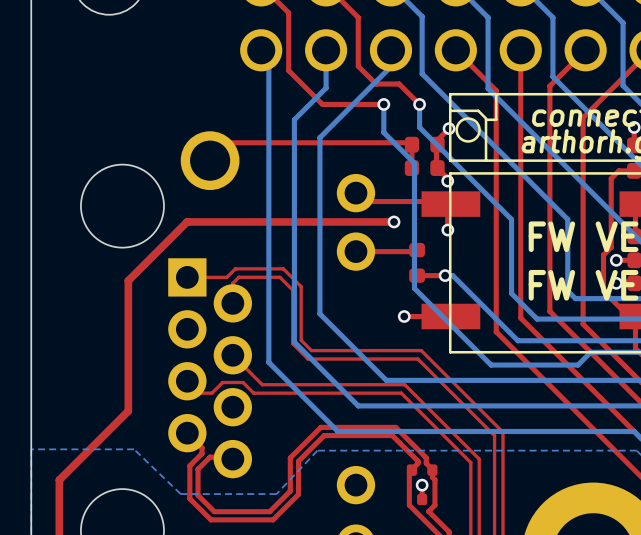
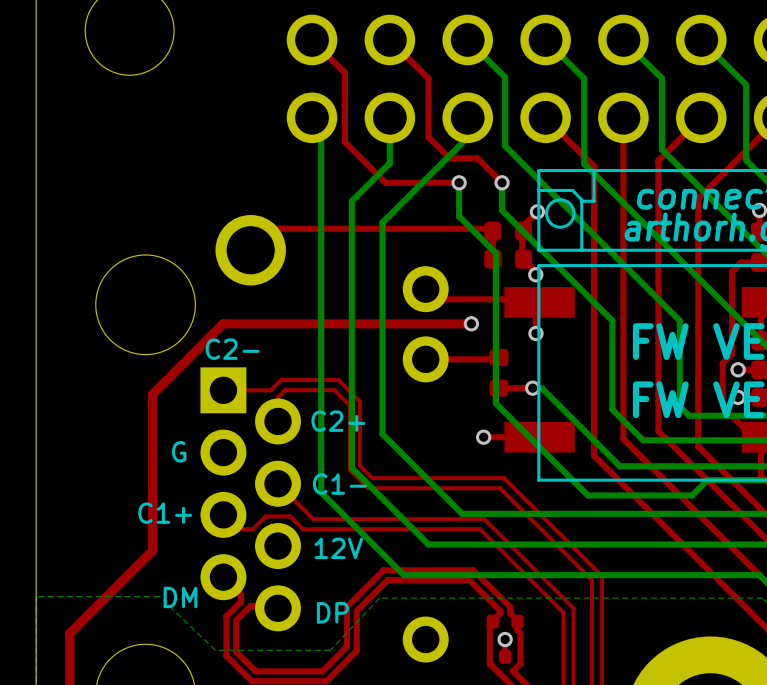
text: none -> C2- (232, 349)
text: none -> C2+ (338, 421)
text: none -> G (179, 451)
text: none -> C1- (339, 484)
text: none -> C1+ (165, 513)
text: none -> 12V (338, 548)
text: none -> DM (180, 597)
text: none -> DP (332, 612)

